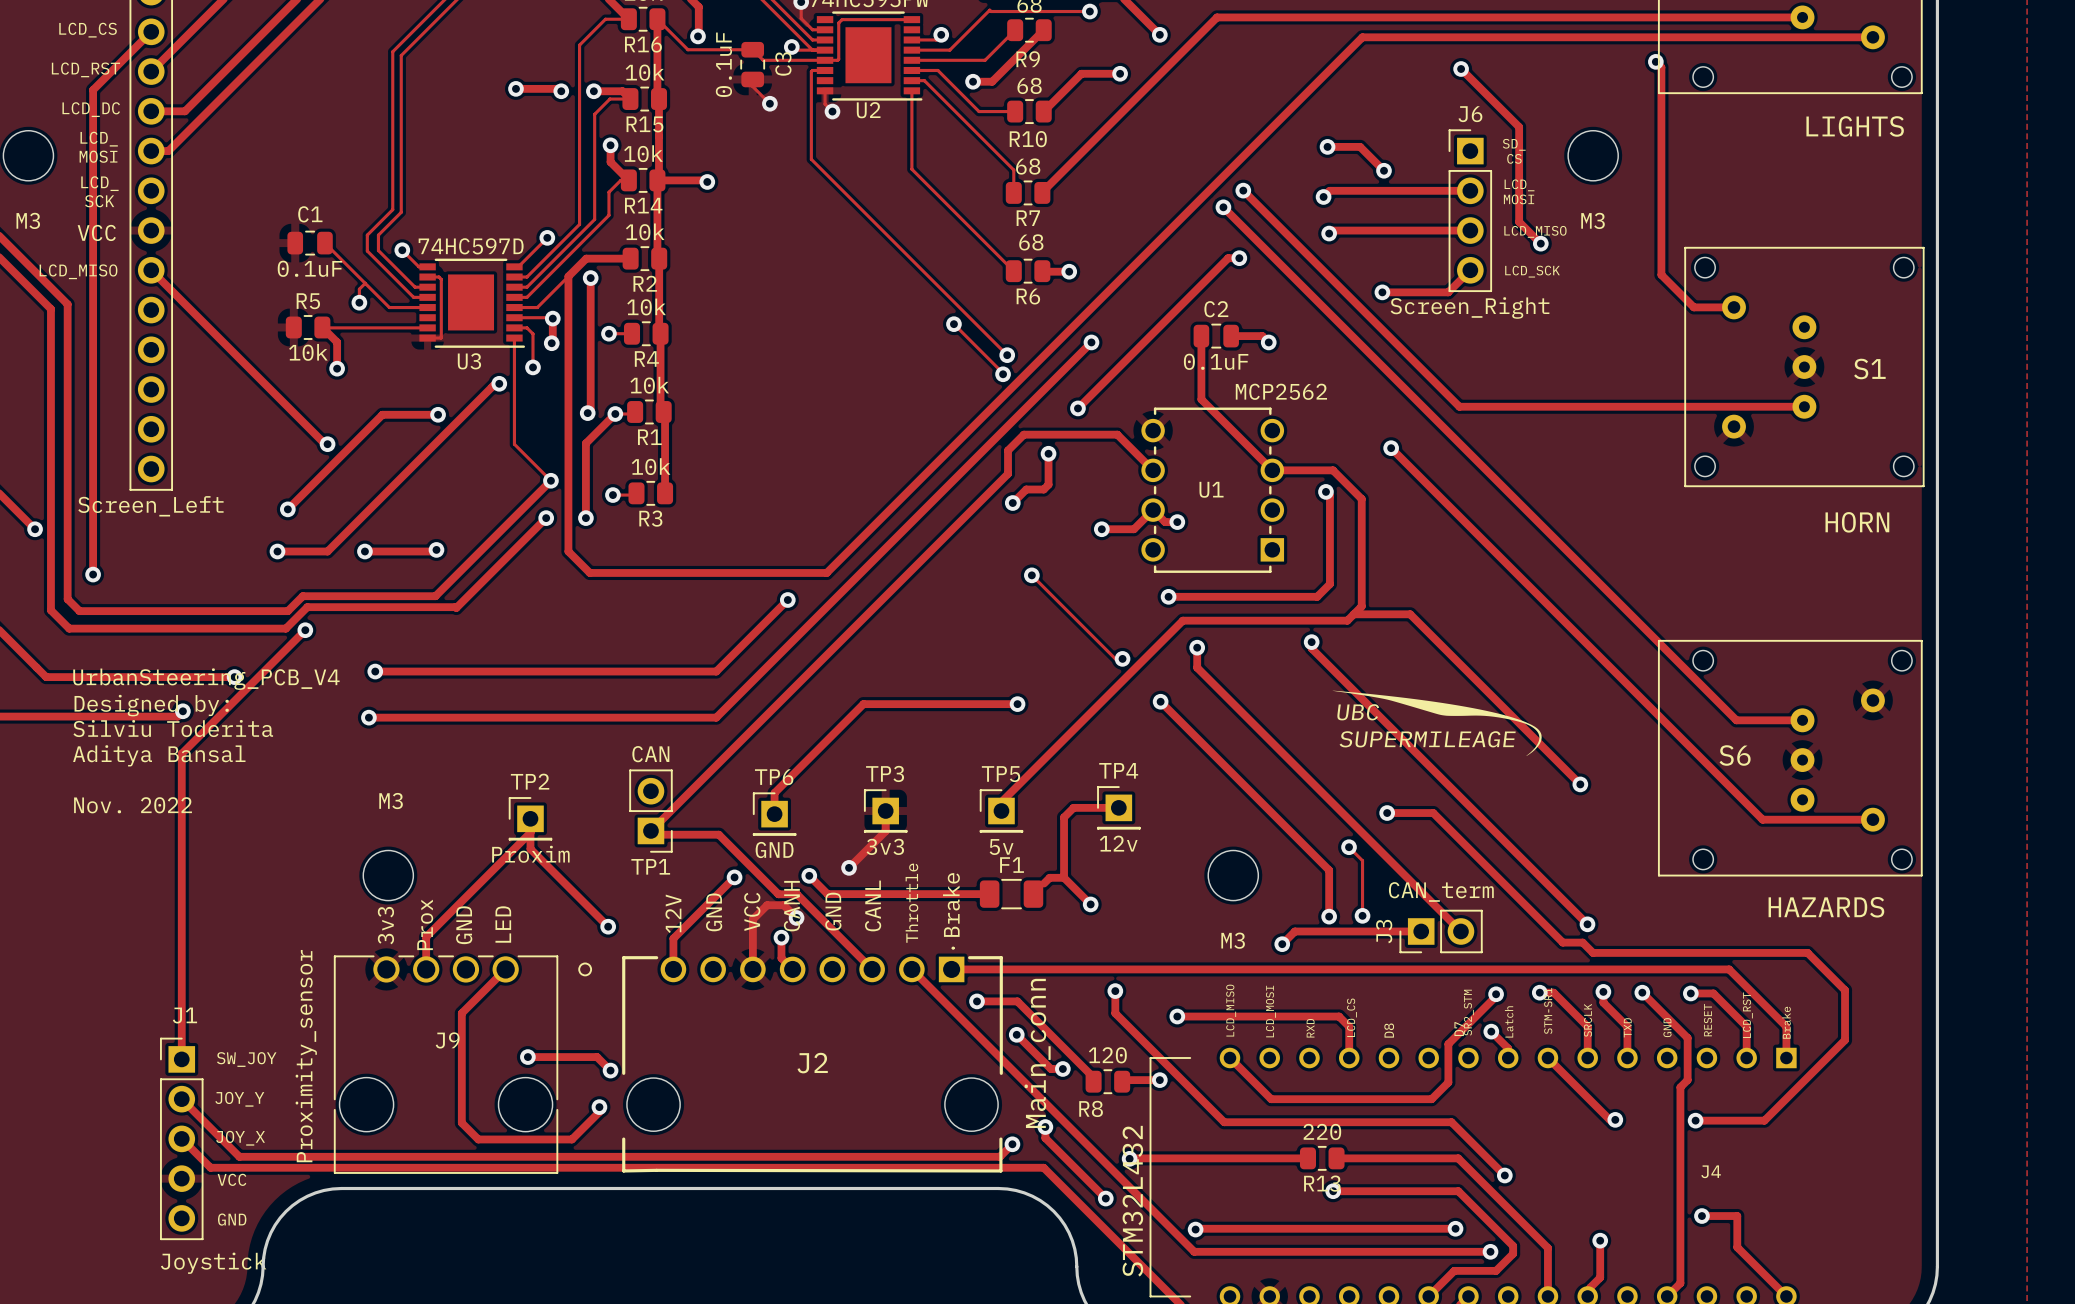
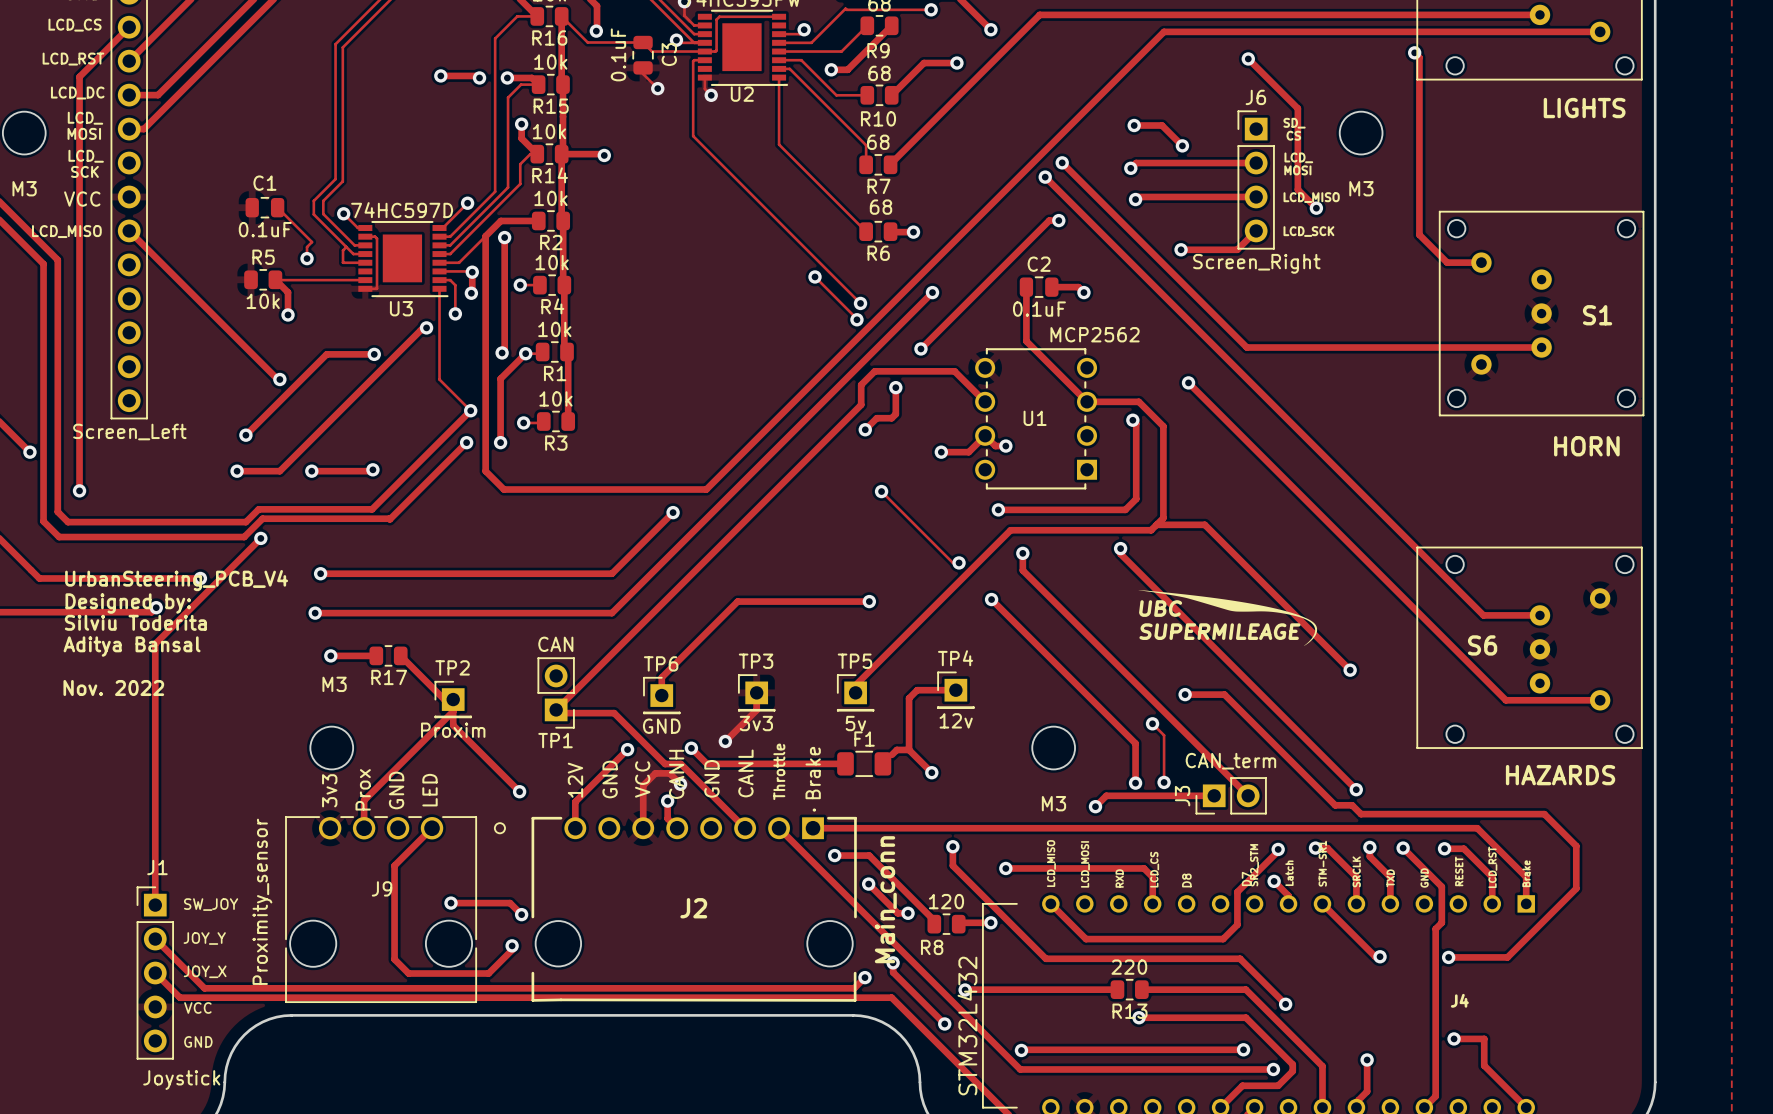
track: (365, 283) (389, 307) (401, 307) -> (346, 247) (343, 250) (343, 262)
track: none -> (330, 655) (376, 655)
via: none -> (330, 655)
R17: none -> (388, 655)
track: none -> (400, 655) (444, 699) (453, 699)

